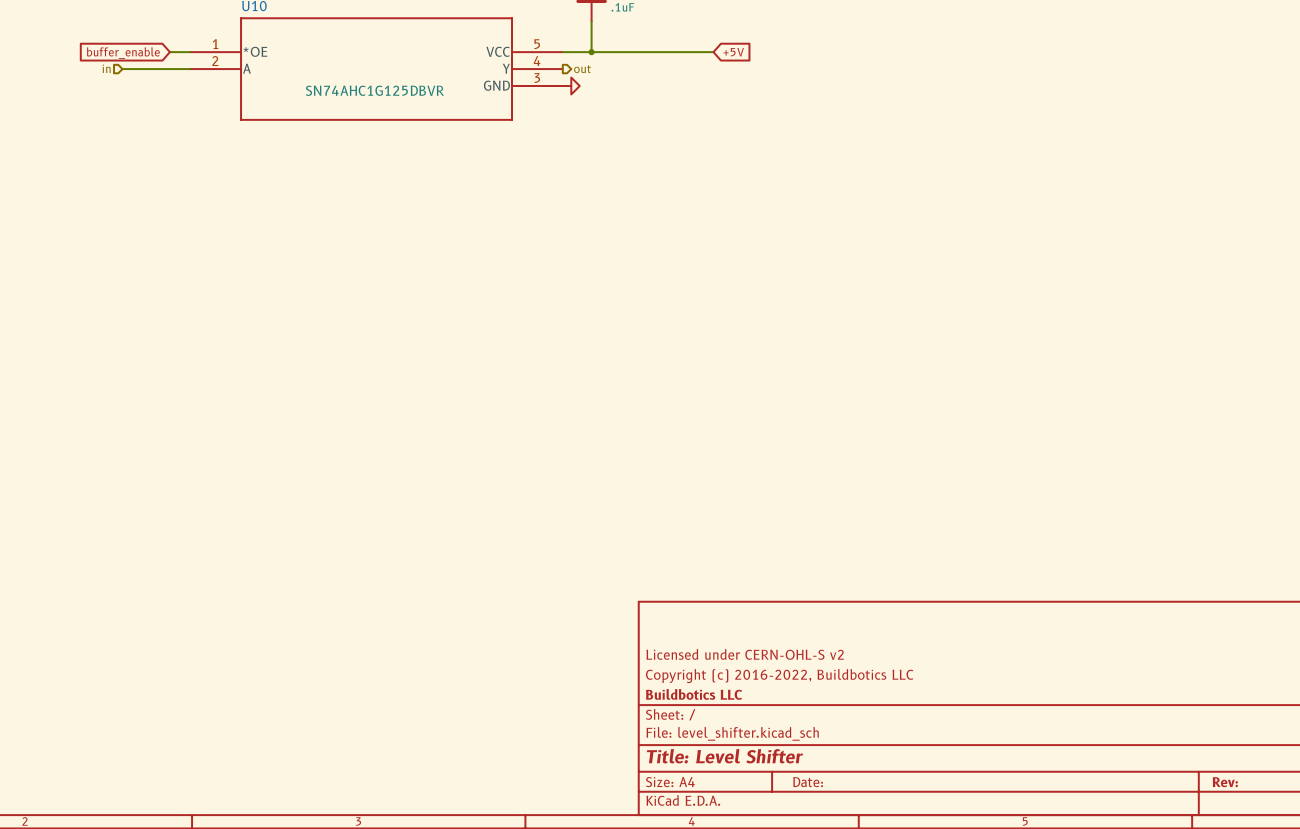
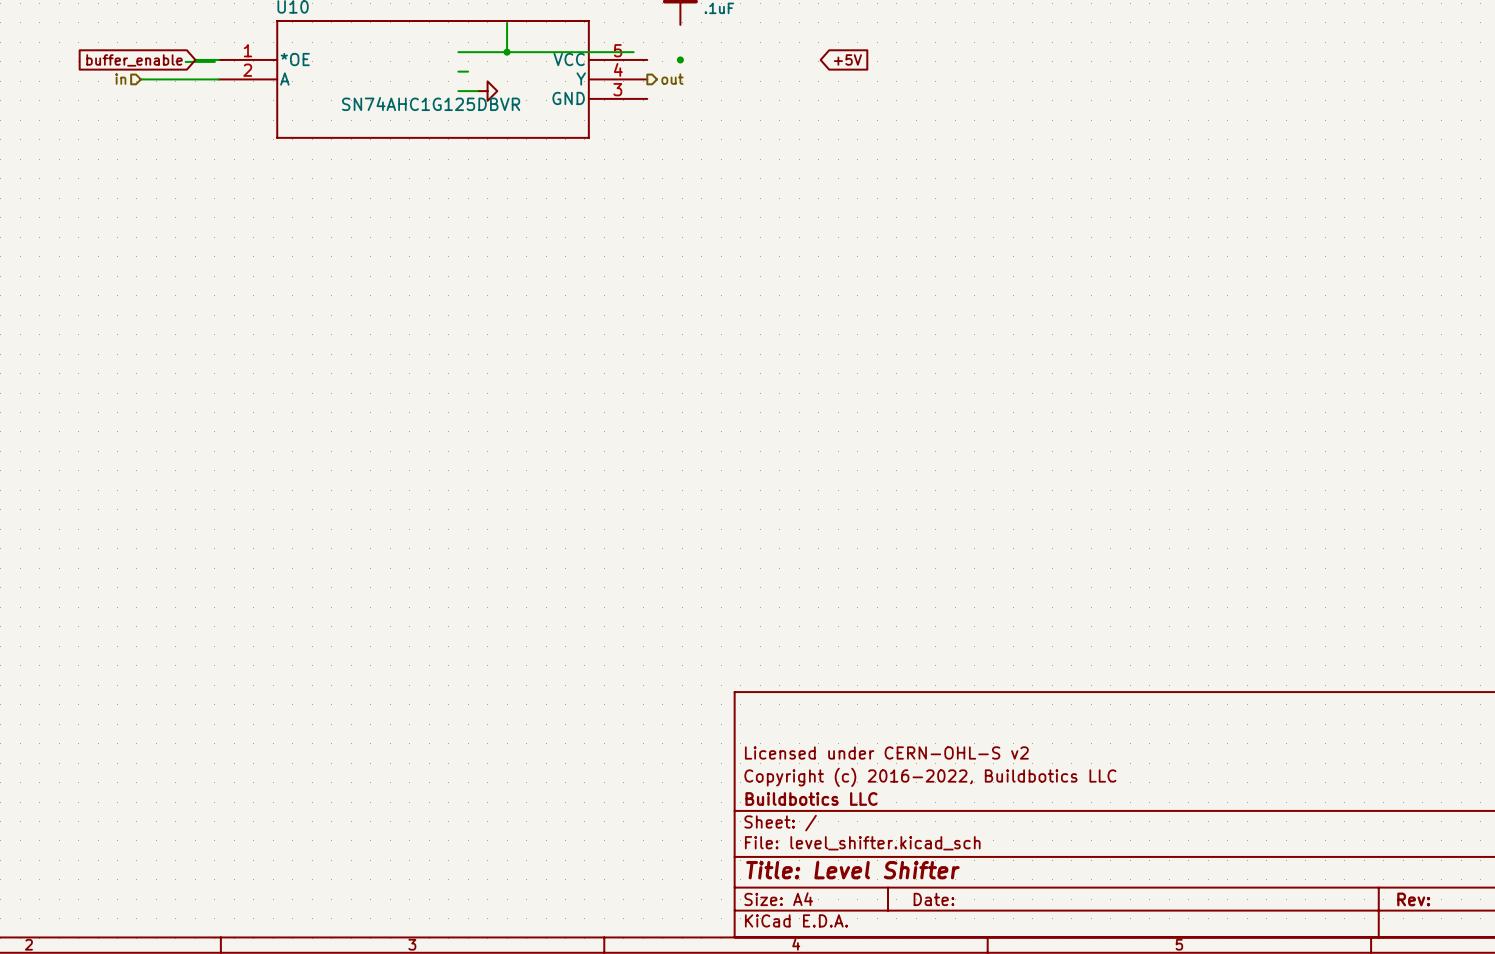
wire: none -> (507, 22) (507, 52)
wire: (591, 21) (591, 52) -> none
wire: none -> (458, 52) (633, 52)
junction: none -> (507, 52)
wire: (562, 52) (713, 52) -> none
wire: none -> (185, 61) (214, 61)
wire: none -> (458, 71) (468, 71)
wire: none -> (458, 91) (477, 91)
power symbol: none -> (487, 91)
power symbol: (571, 86) -> none

